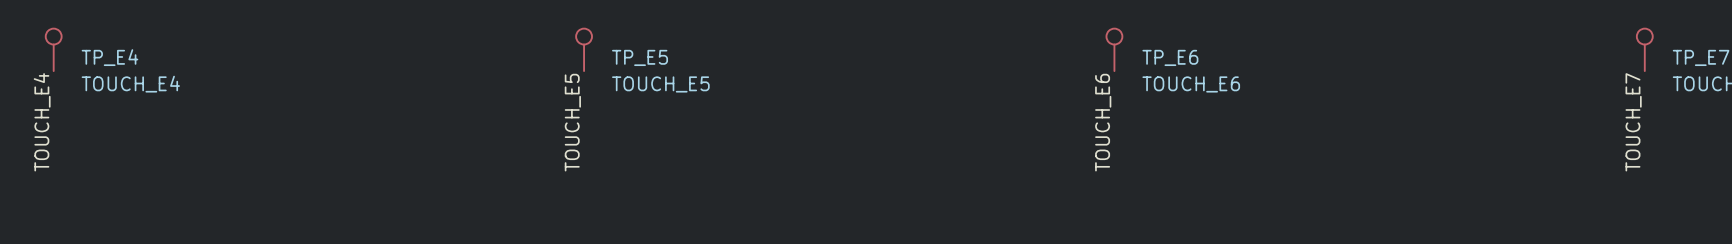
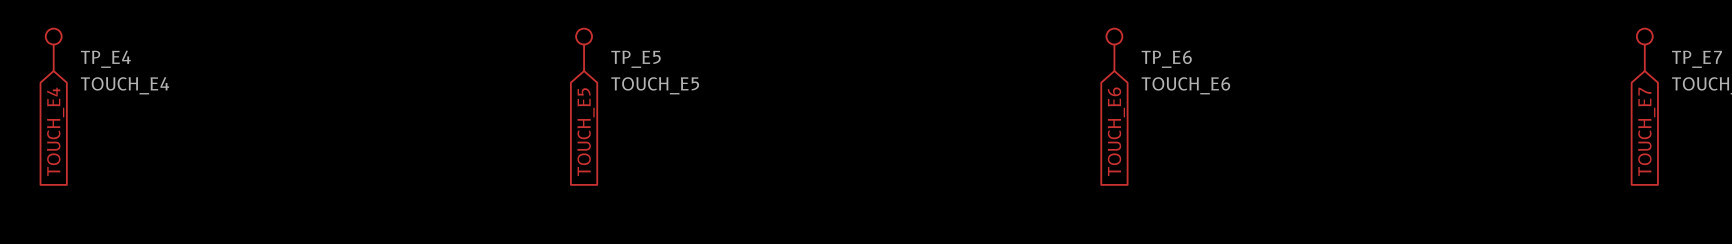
label: TOUCH_E4 (42, 122) -> none
label: TOUCH_E5 (572, 122) -> none
label: TOUCH_E6 (1103, 122) -> none
label: TOUCH_E7 (1633, 122) -> none
global label: none -> TOUCH_E4 (55, 131)
global label: none -> TOUCH_E5 (586, 132)
global label: none -> TOUCH_E6 (1116, 131)
global label: none -> TOUCH_E7 (1646, 131)

